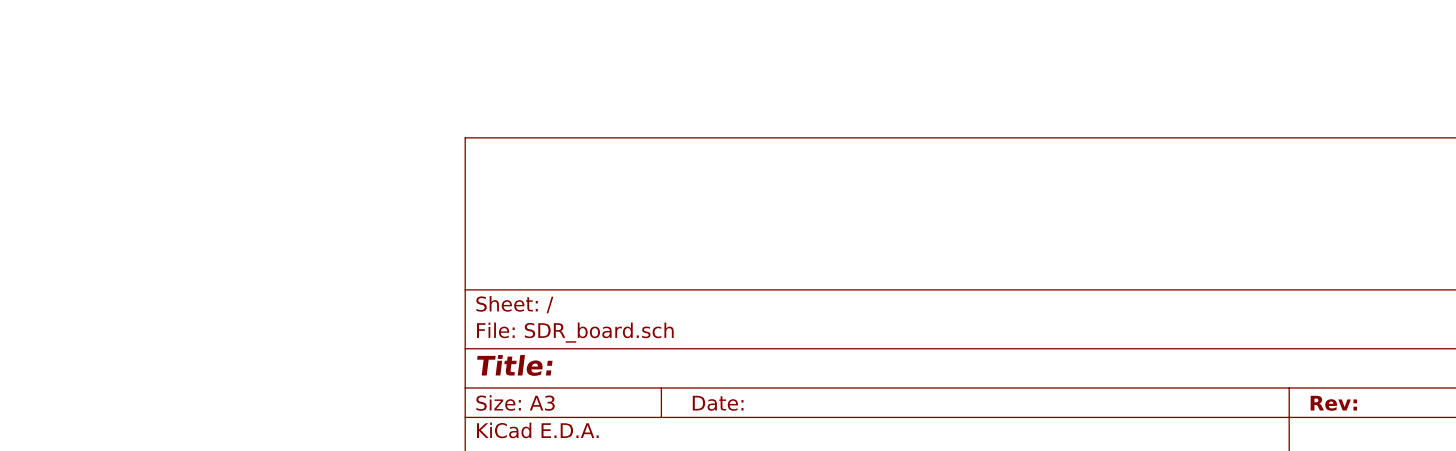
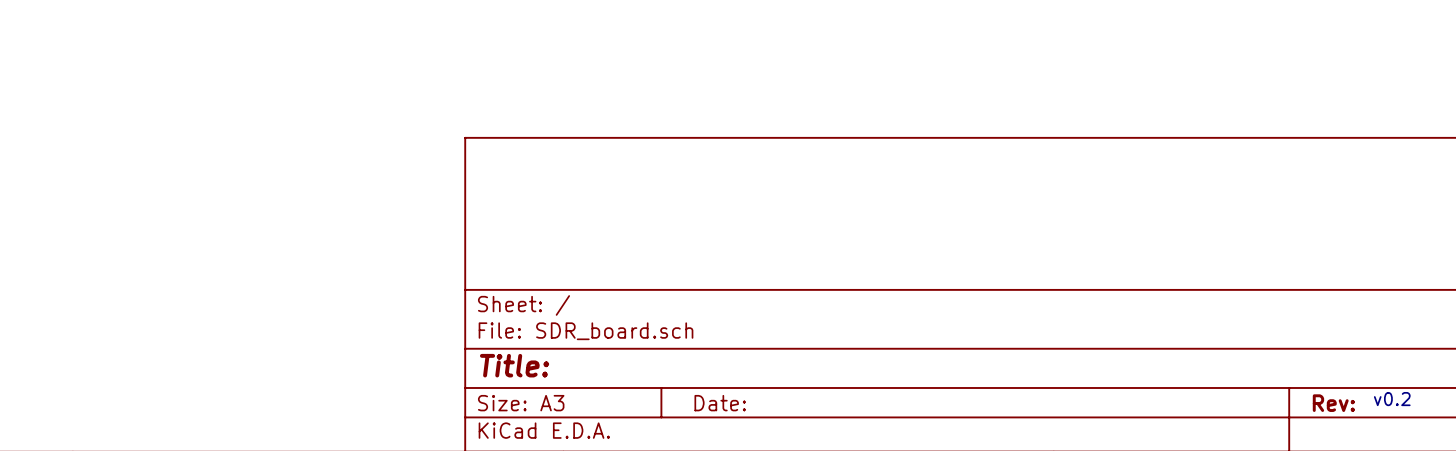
text: none -> v0.2 (1392, 399)

